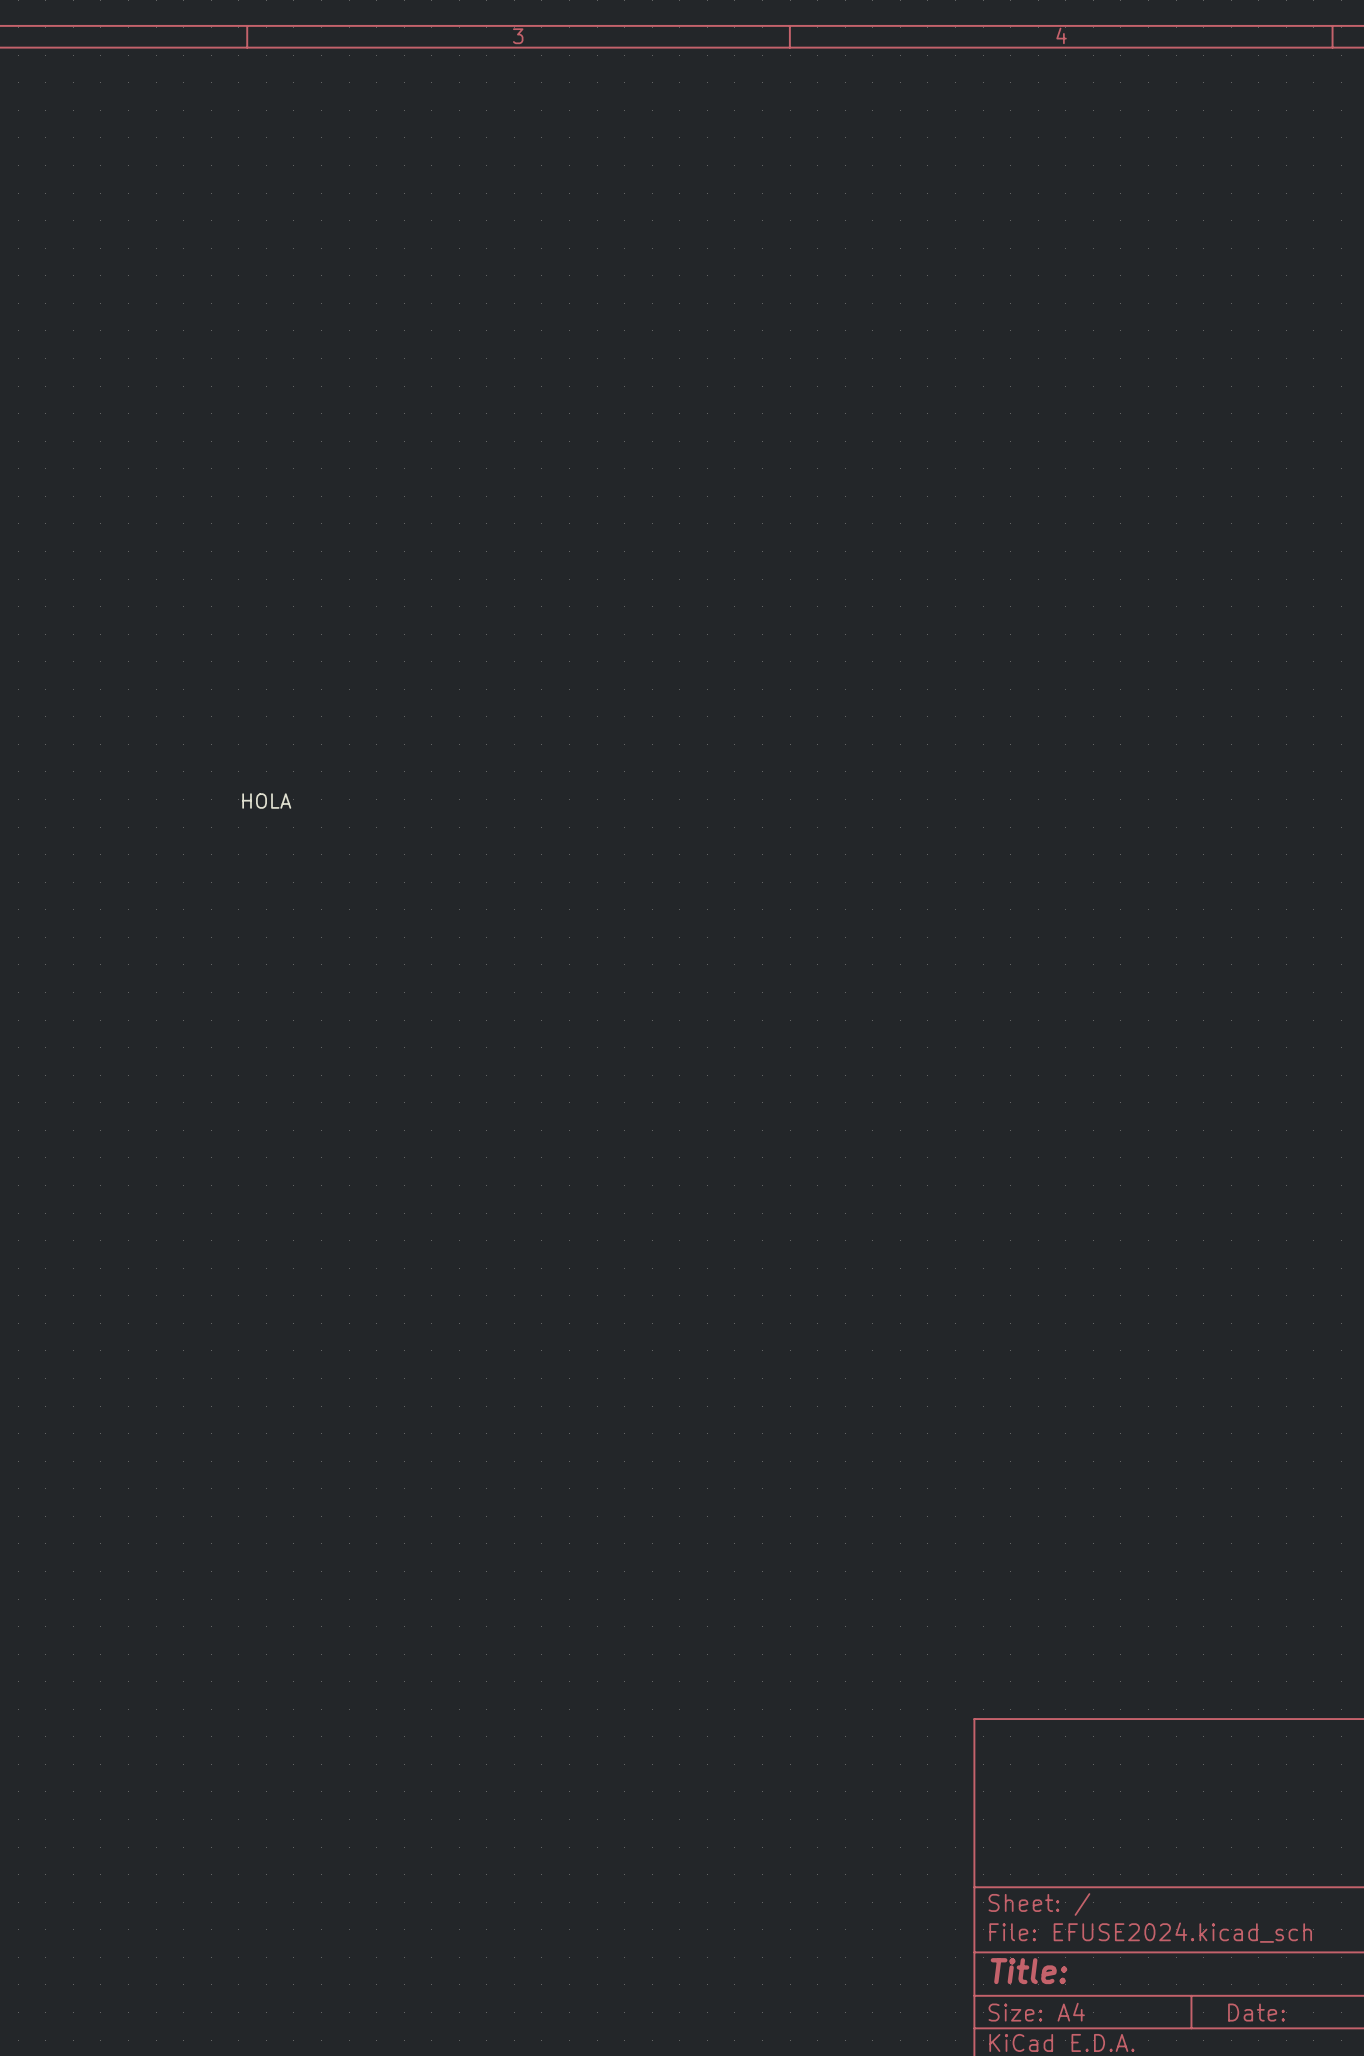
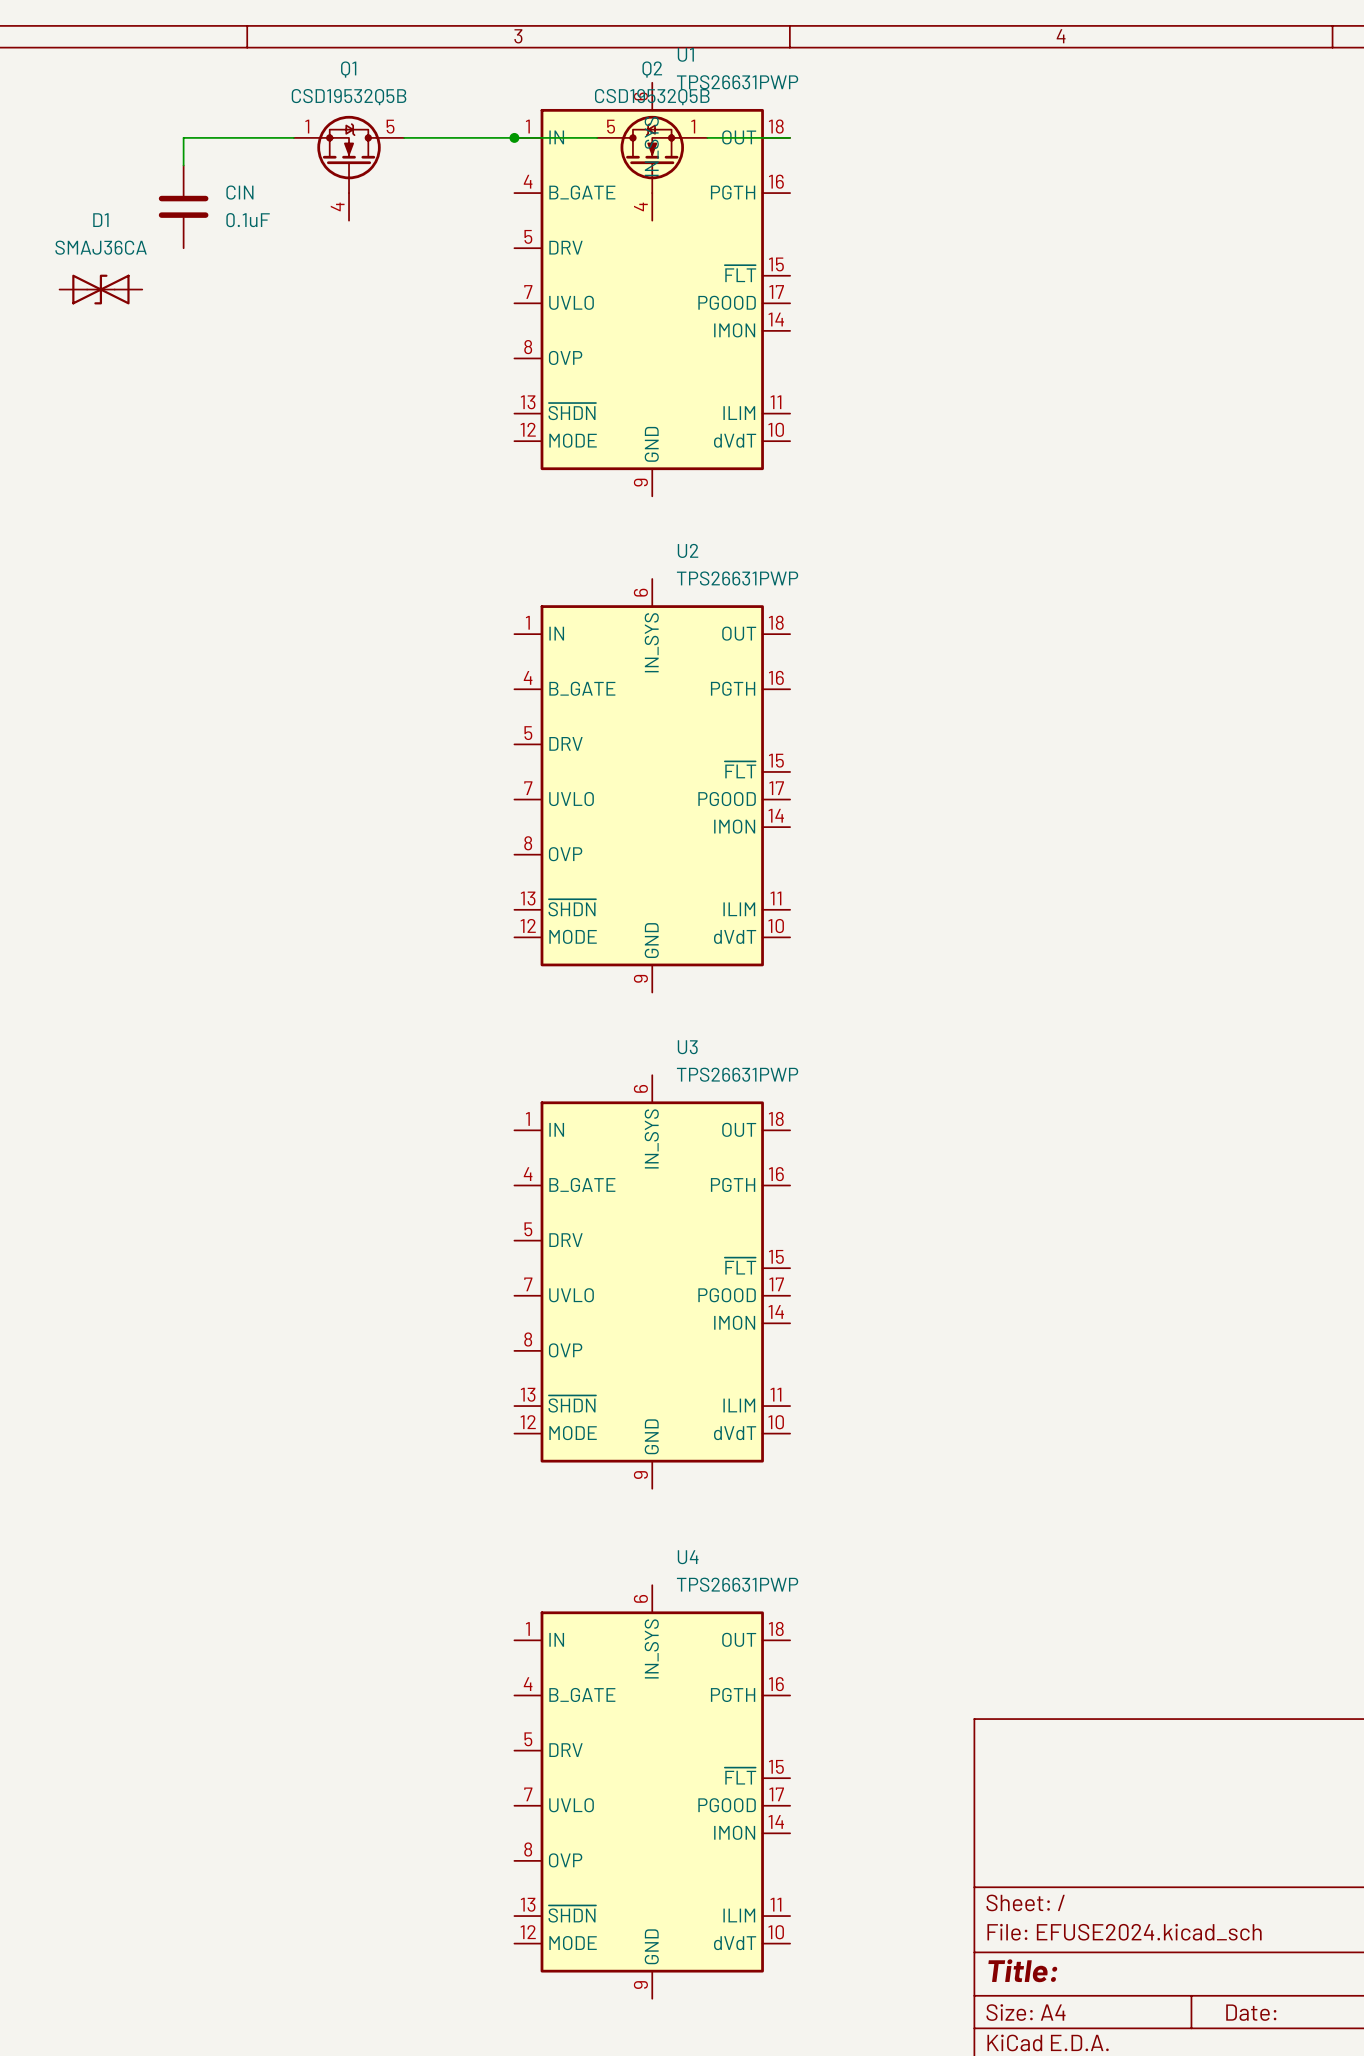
wire: none -> (293, 137) (183, 137) (183, 165)
wire: none -> (404, 137) (597, 137)
junction: none -> (514, 137)
wire: none -> (707, 137) (790, 137)
Q1: none -> CSD19532Q5B (349, 168)
Q2: none -> CSD19532Q5B (652, 168)
CIN: none -> 0.1uF (183, 206)
D1: none -> SMAJ36CA (100, 289)
U1: none -> TPS26631PWP (652, 289)
U2: none -> TPS26631PWP (652, 785)
label: HOLA (266, 801) -> none
U3: none -> TPS26631PWP (652, 1281)
U4: none -> TPS26631PWP (652, 1791)

